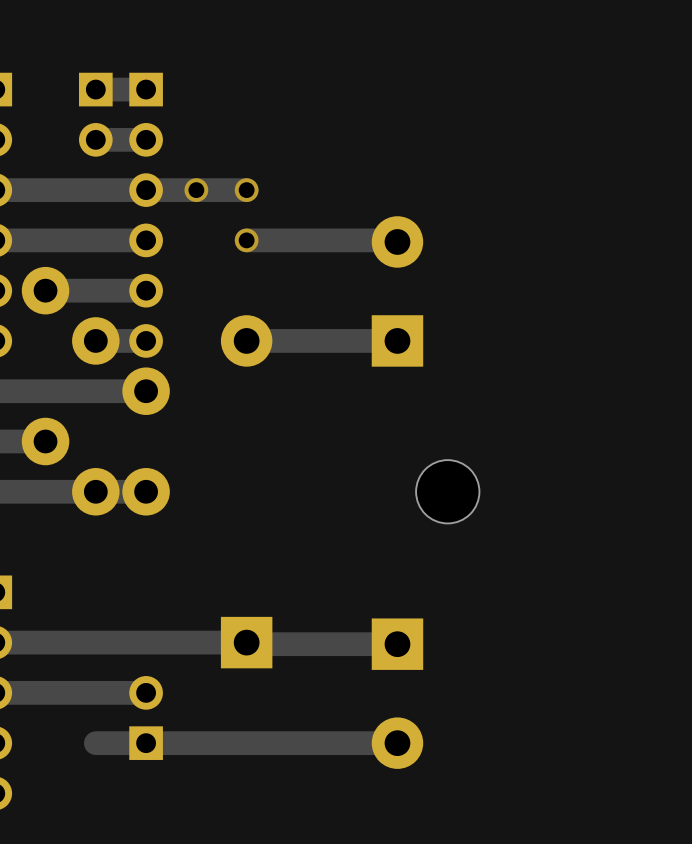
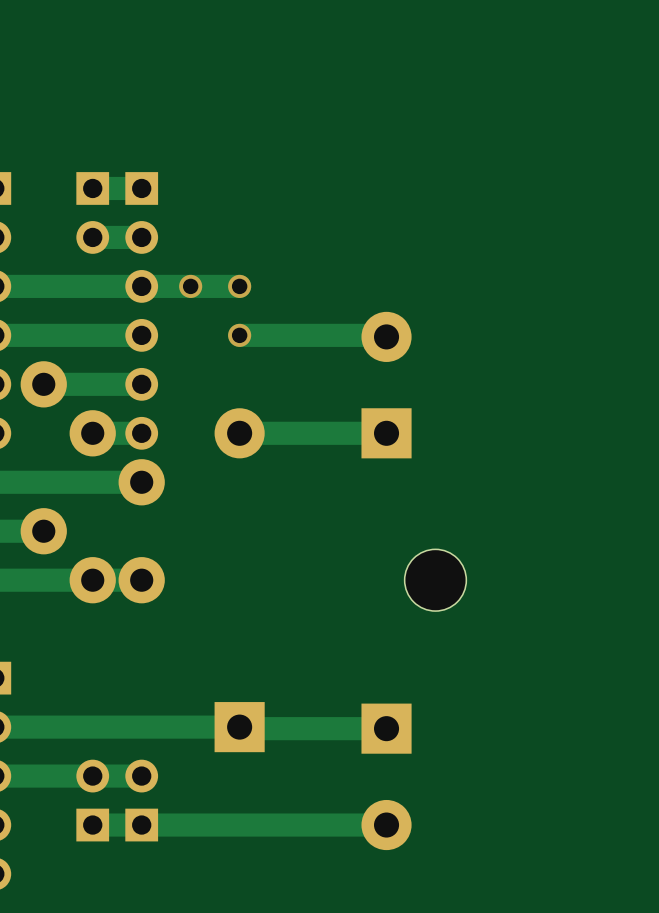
part: none -> (92, 800)

